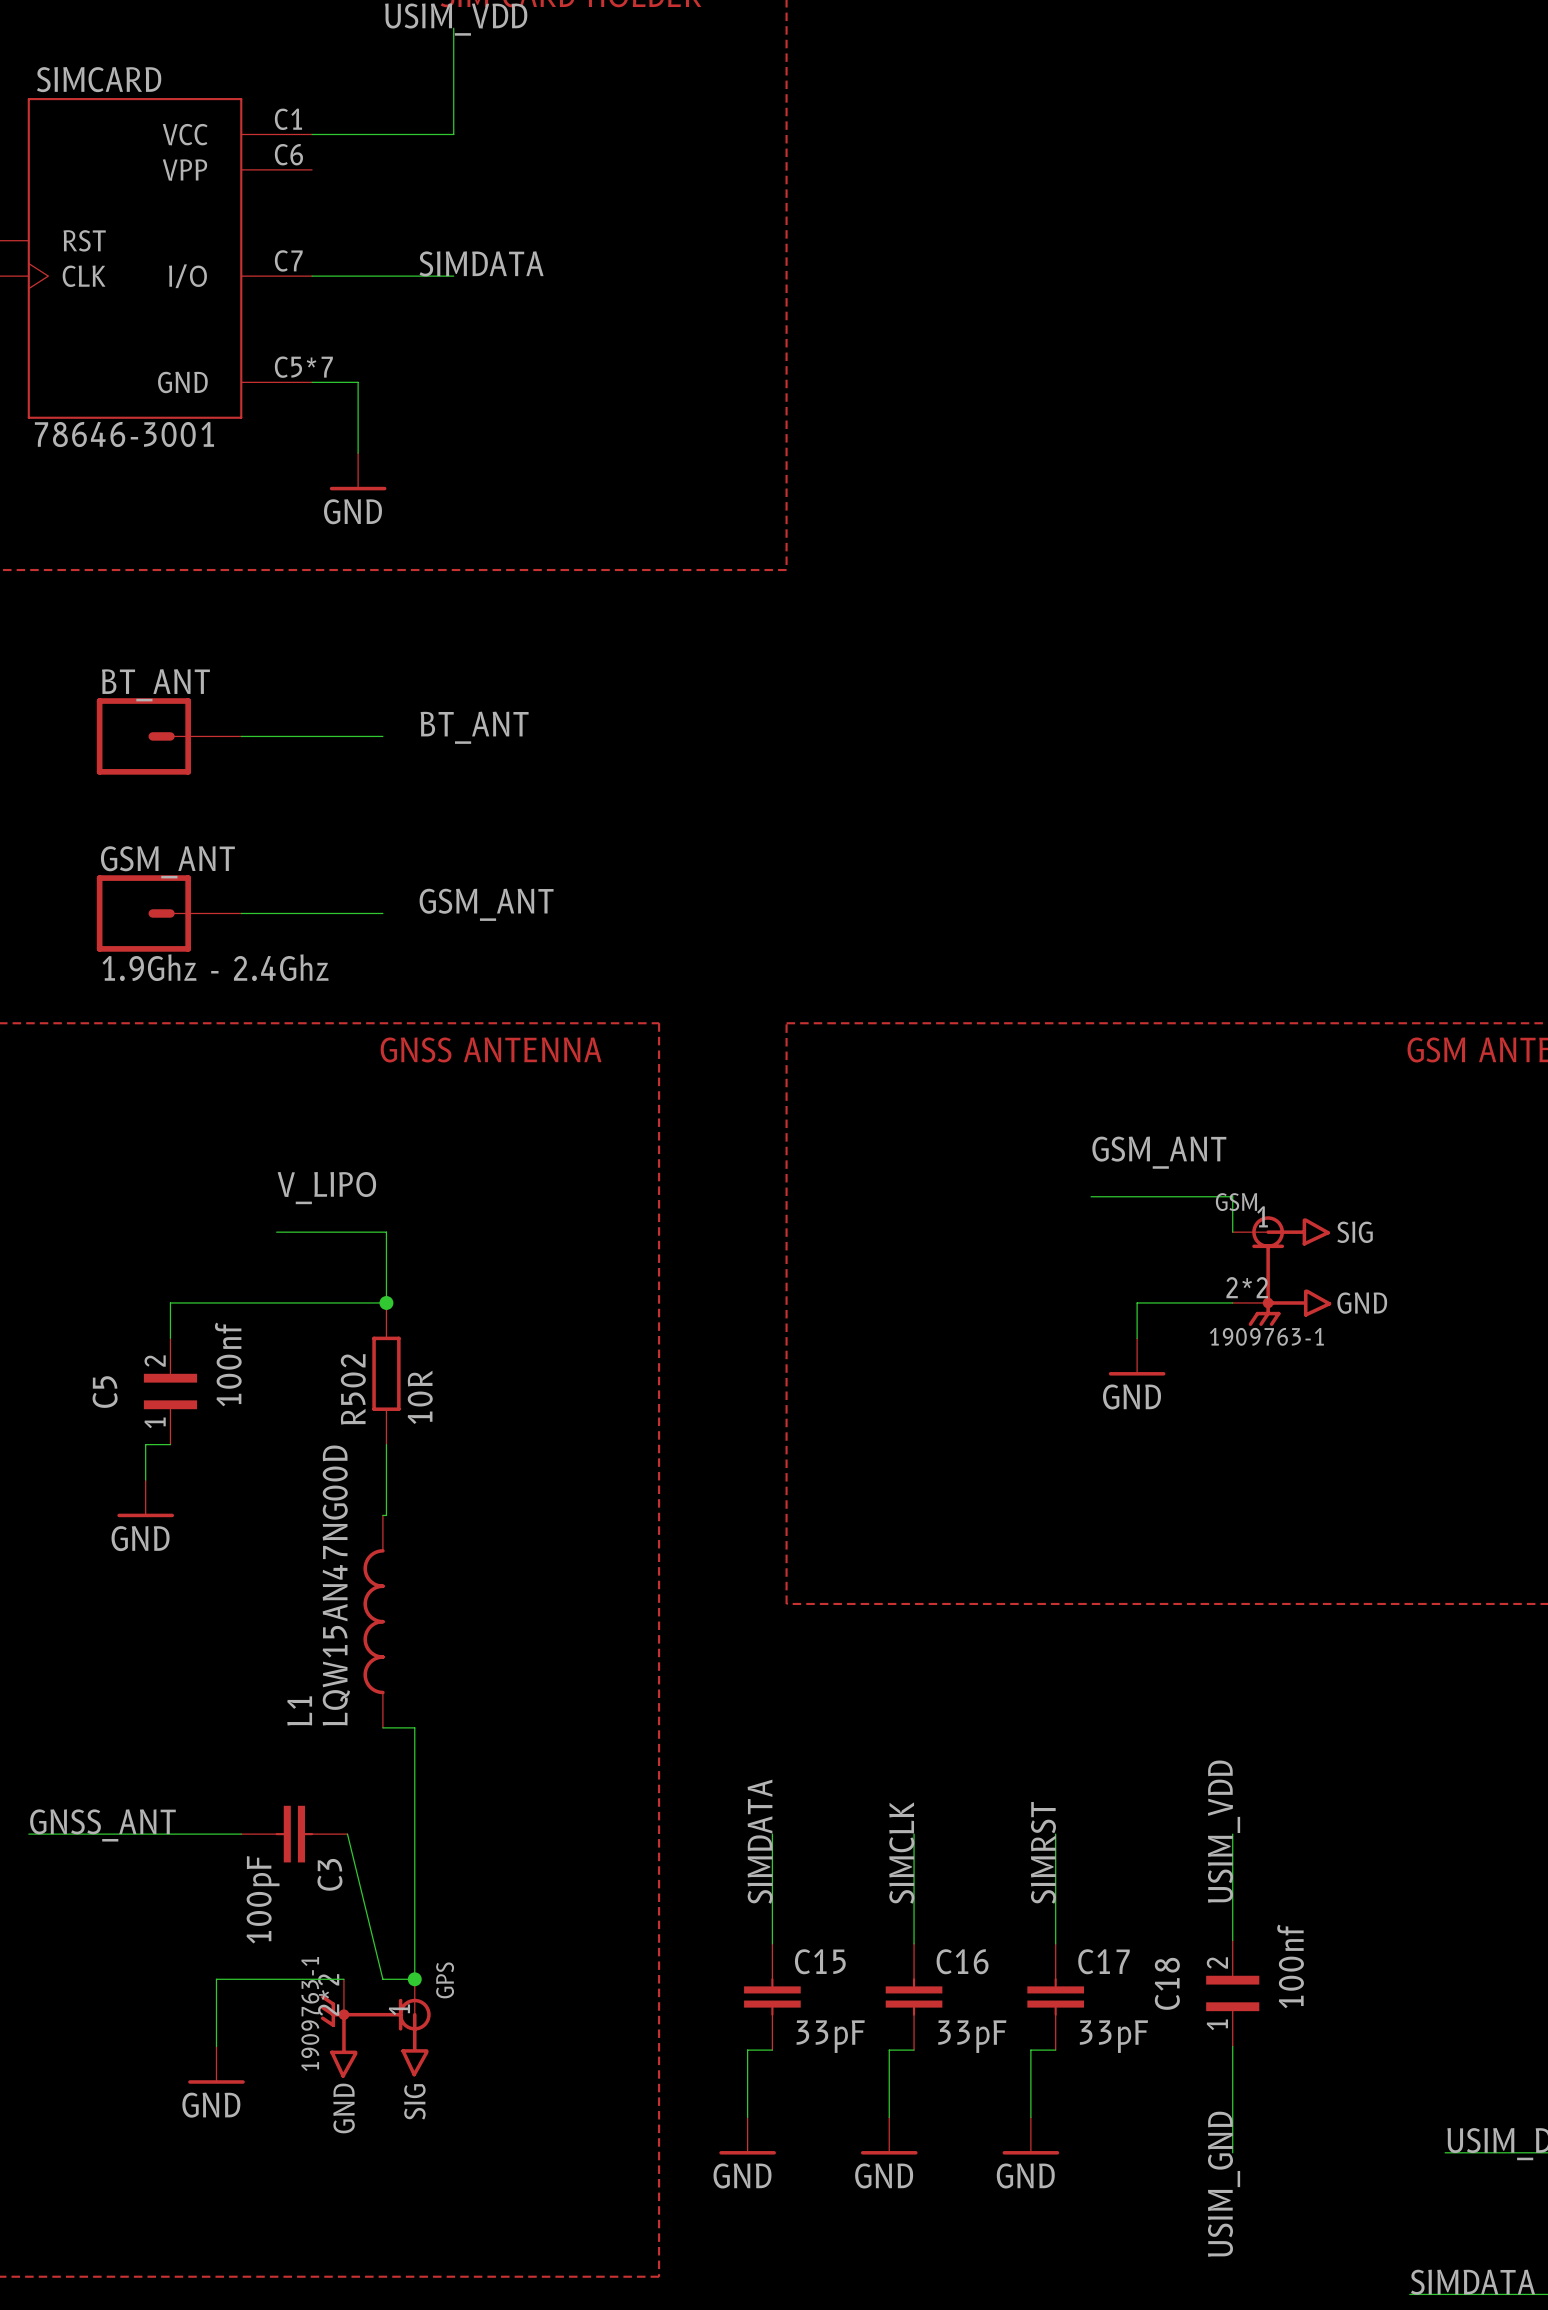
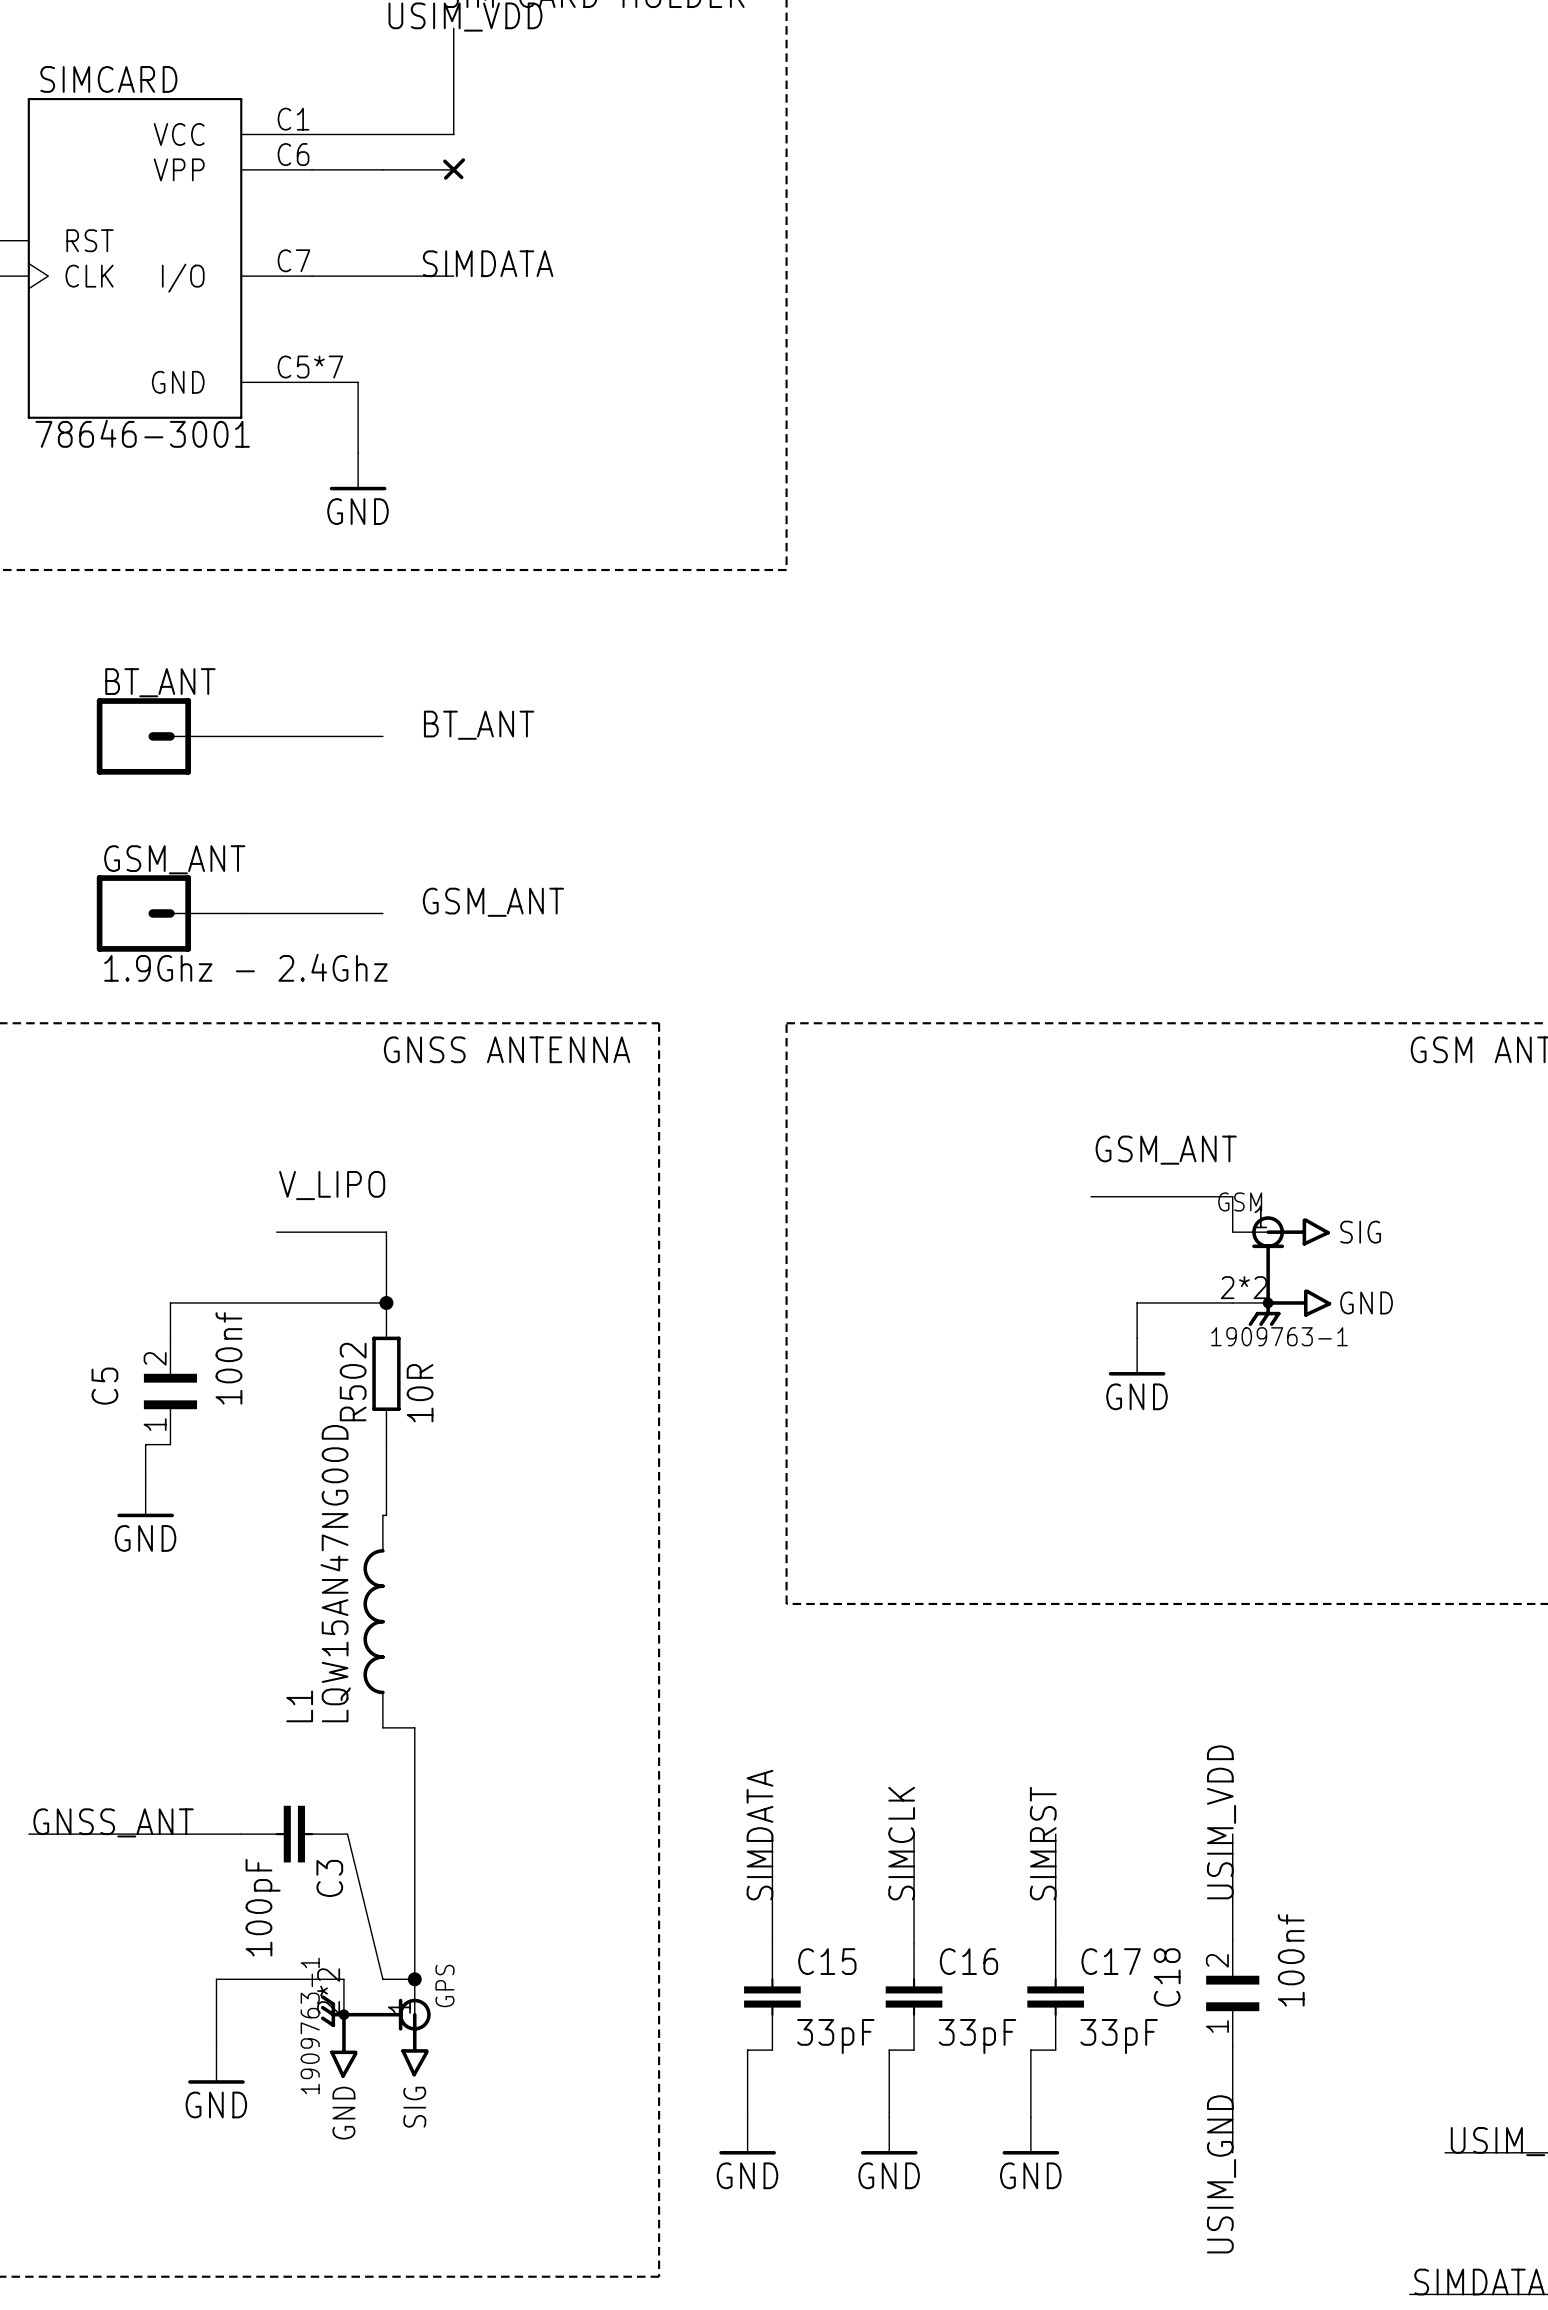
part: none -> (423, 168)
wire: none -> (312, 169) (382, 169)

